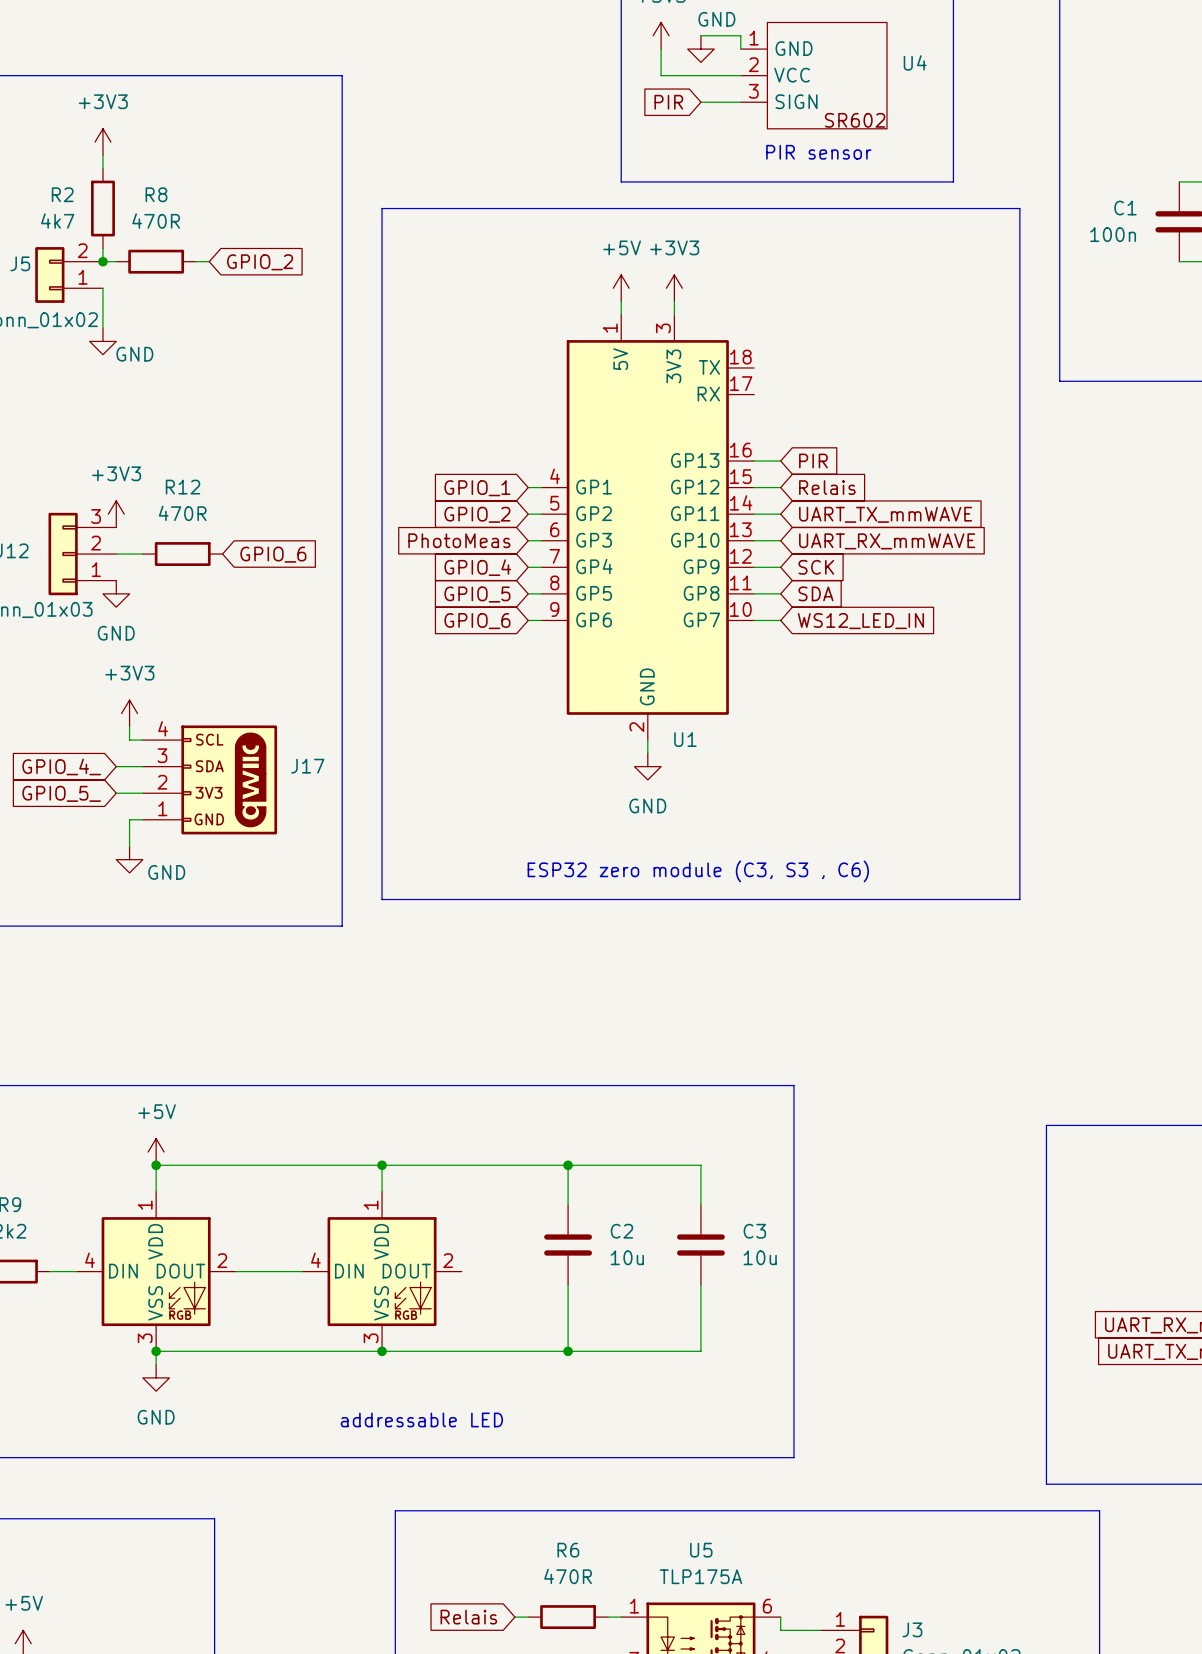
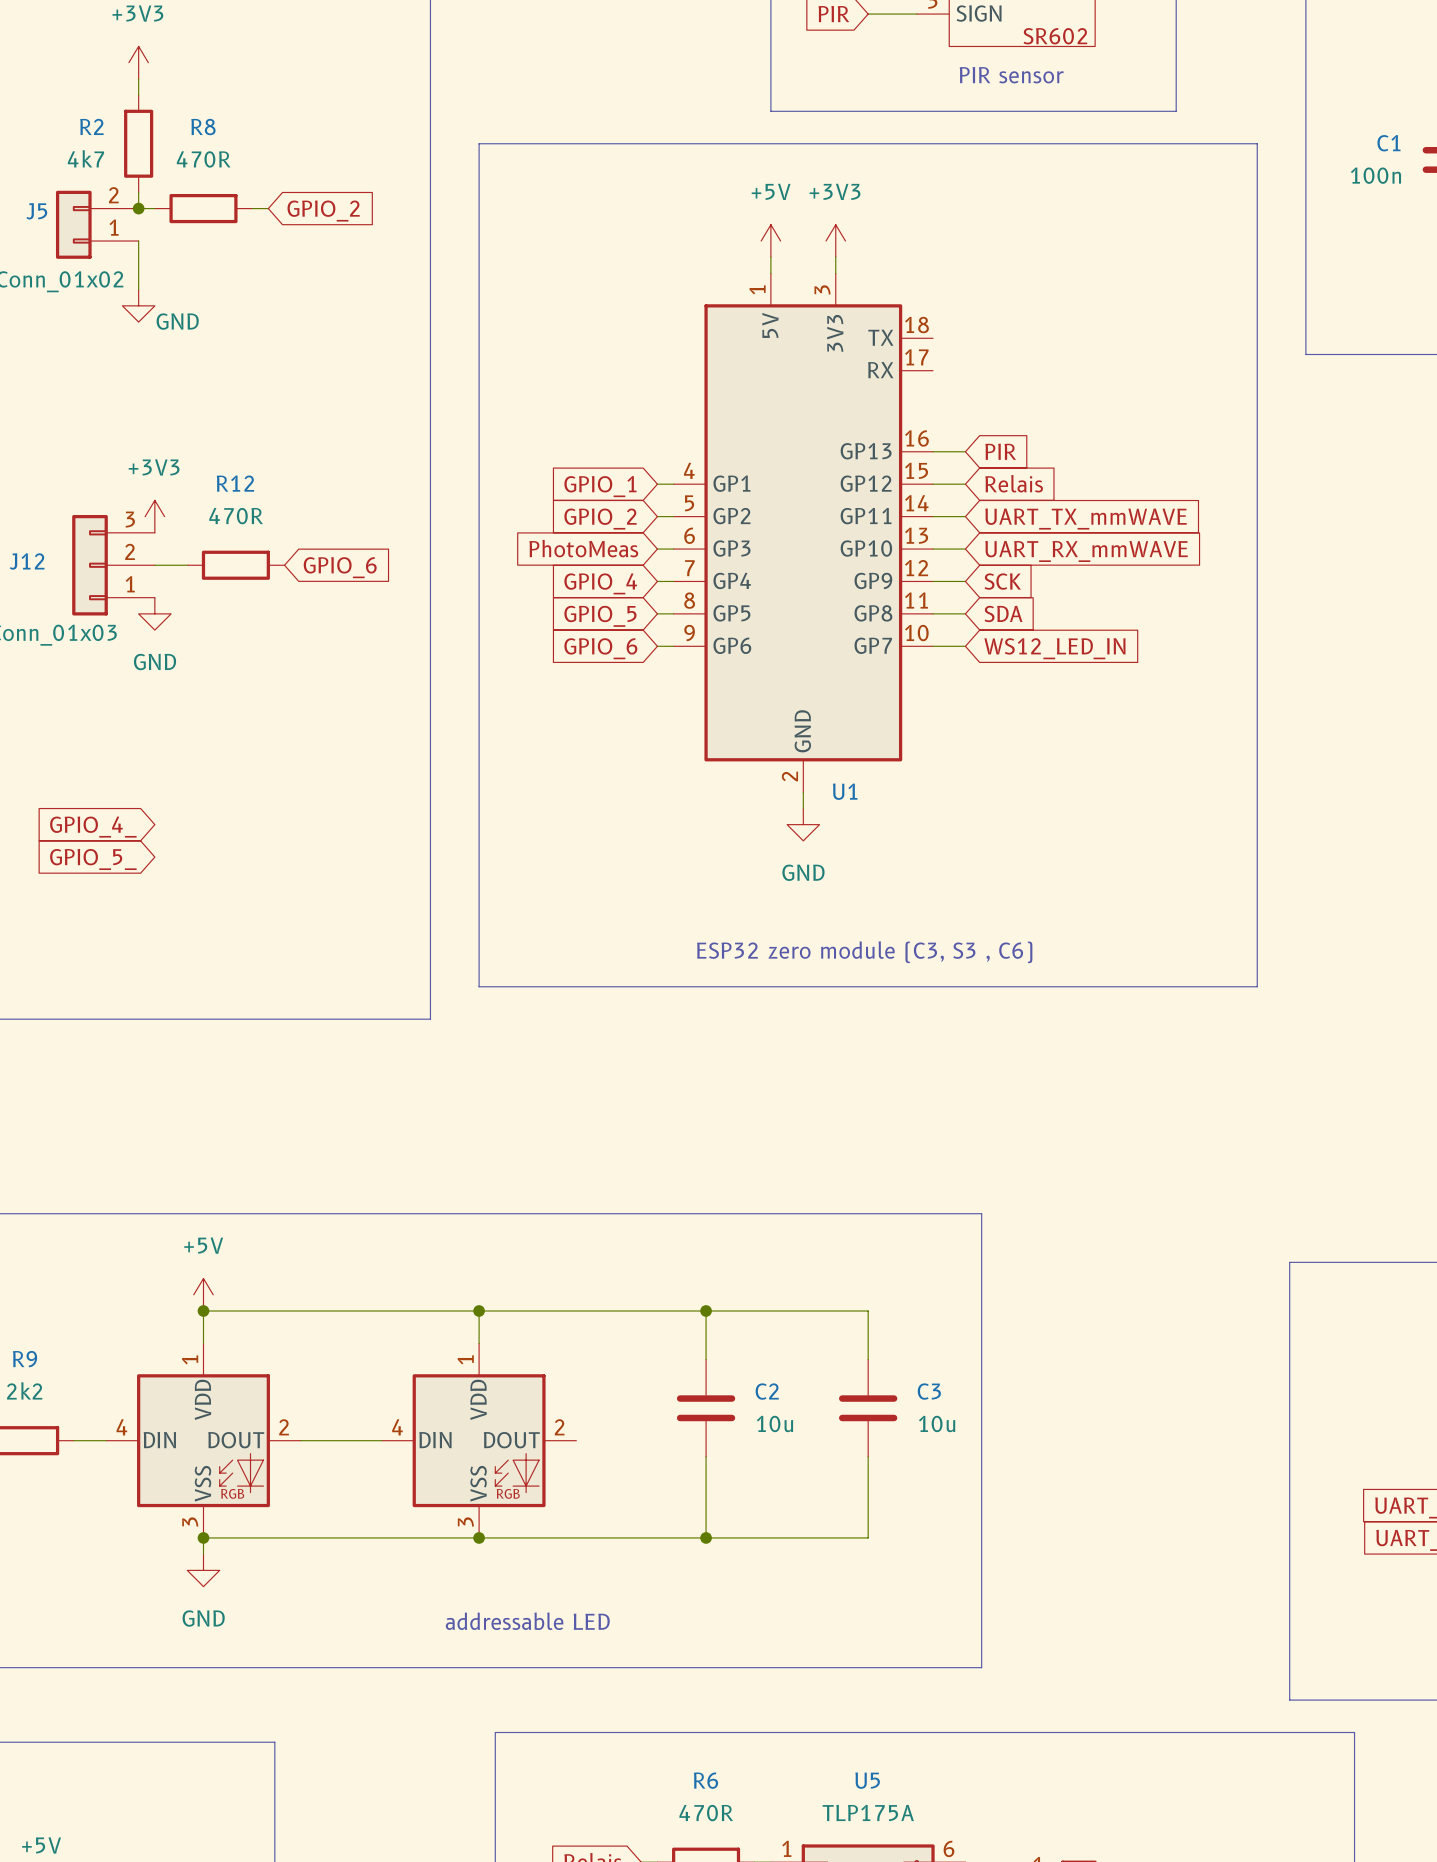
power symbol: +3V3 (129, 713) -> none
wire: (129, 726) (129, 740) (142, 740) -> none
wire: (116, 766) (142, 766) -> none
J17: (209, 779) -> none
wire: (116, 793) (142, 793) -> none
wire: (142, 819) (129, 819) (129, 846) -> none
power symbol: GND (129, 859) -> none

